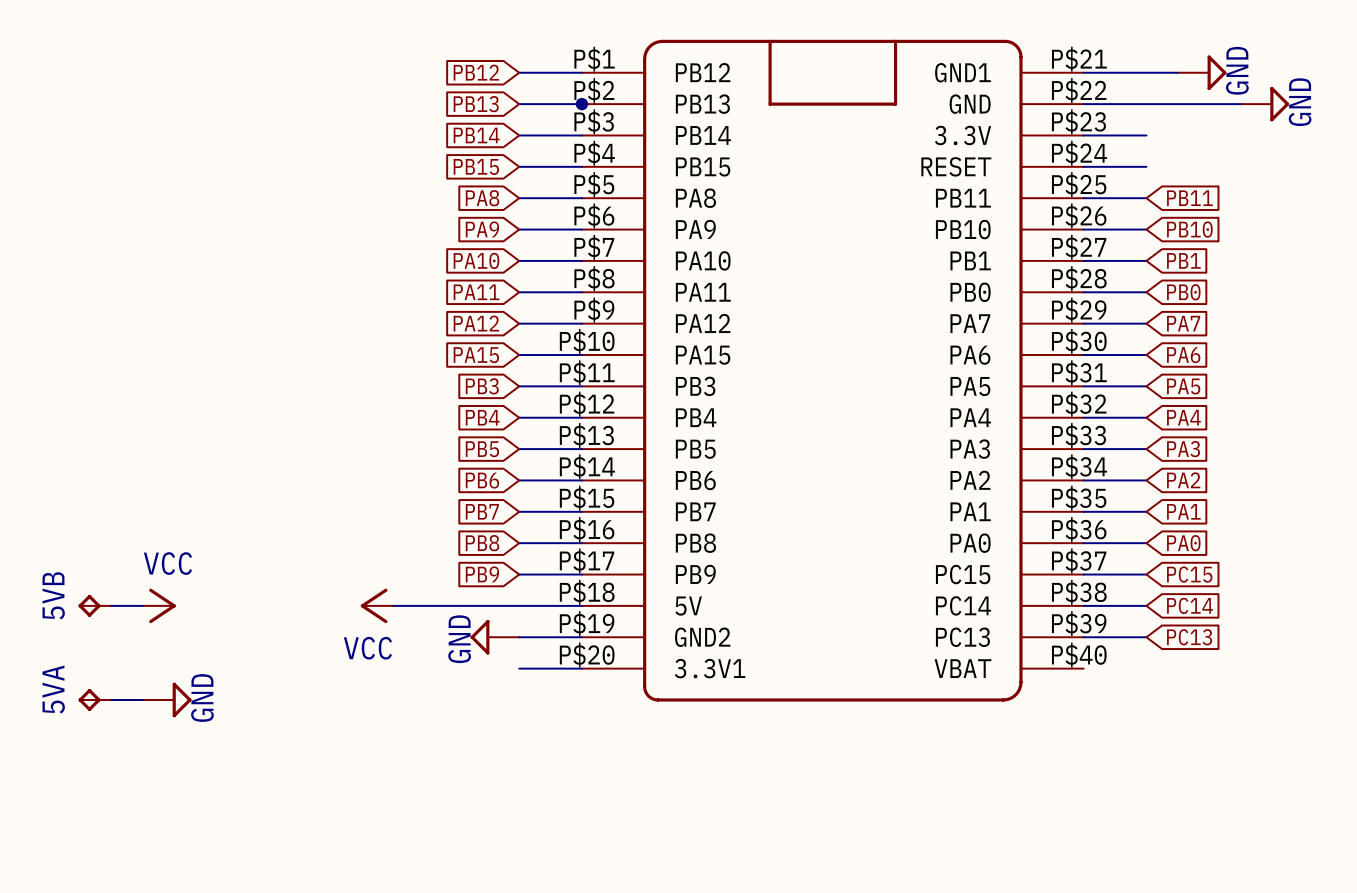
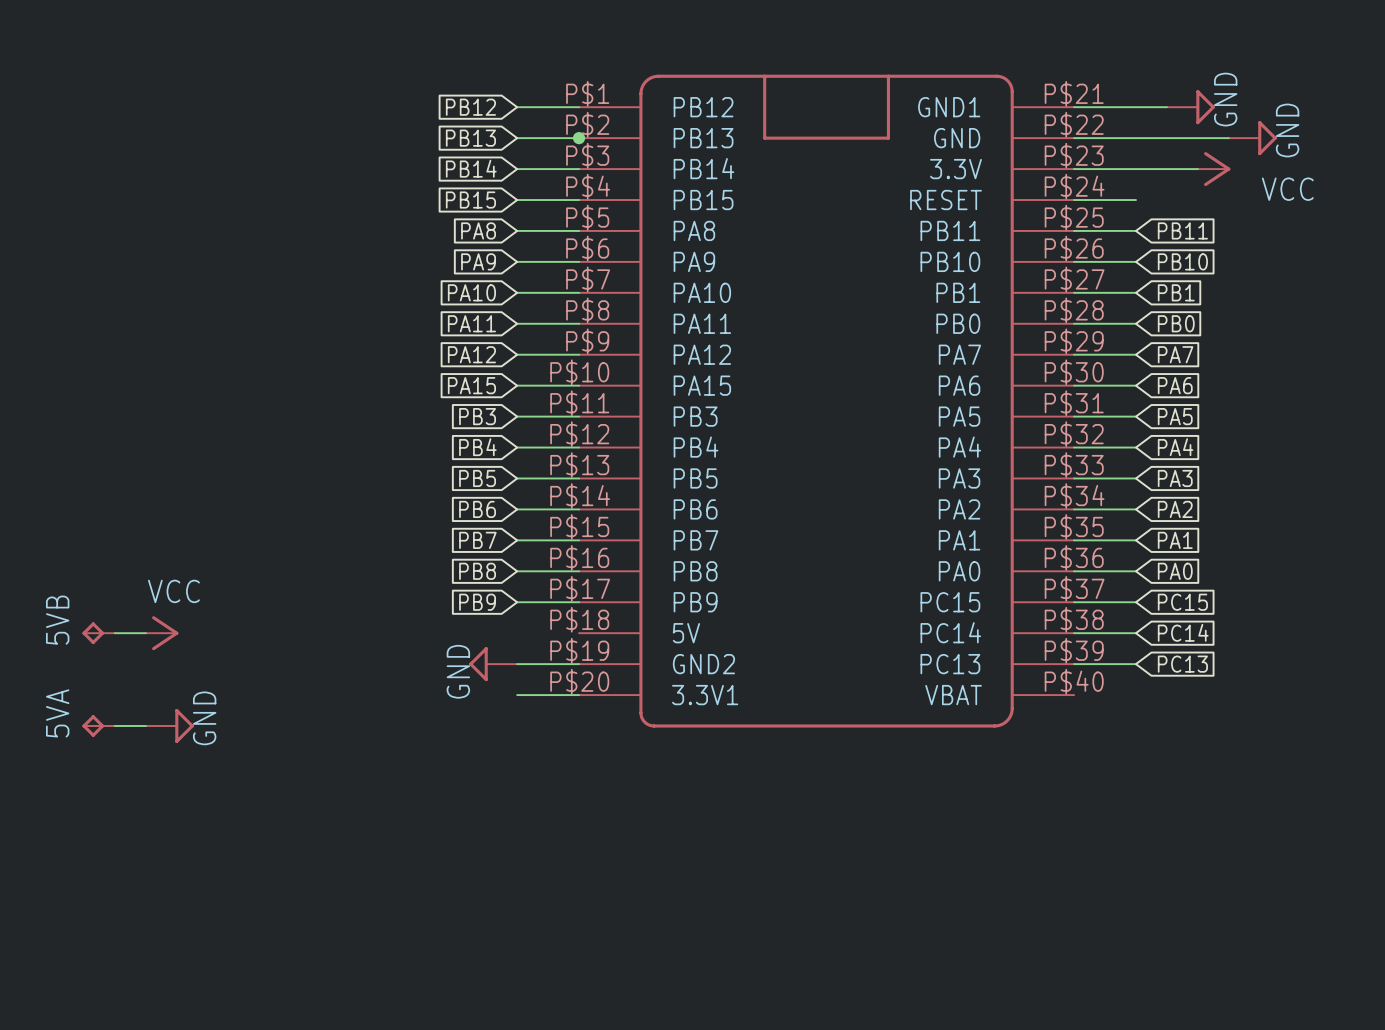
wire: none -> (1135, 169) (1197, 169)
power symbol: none -> VCC (1214, 169)
power symbol: VCC (377, 605) -> none
wire: (393, 605) (581, 605) -> none

